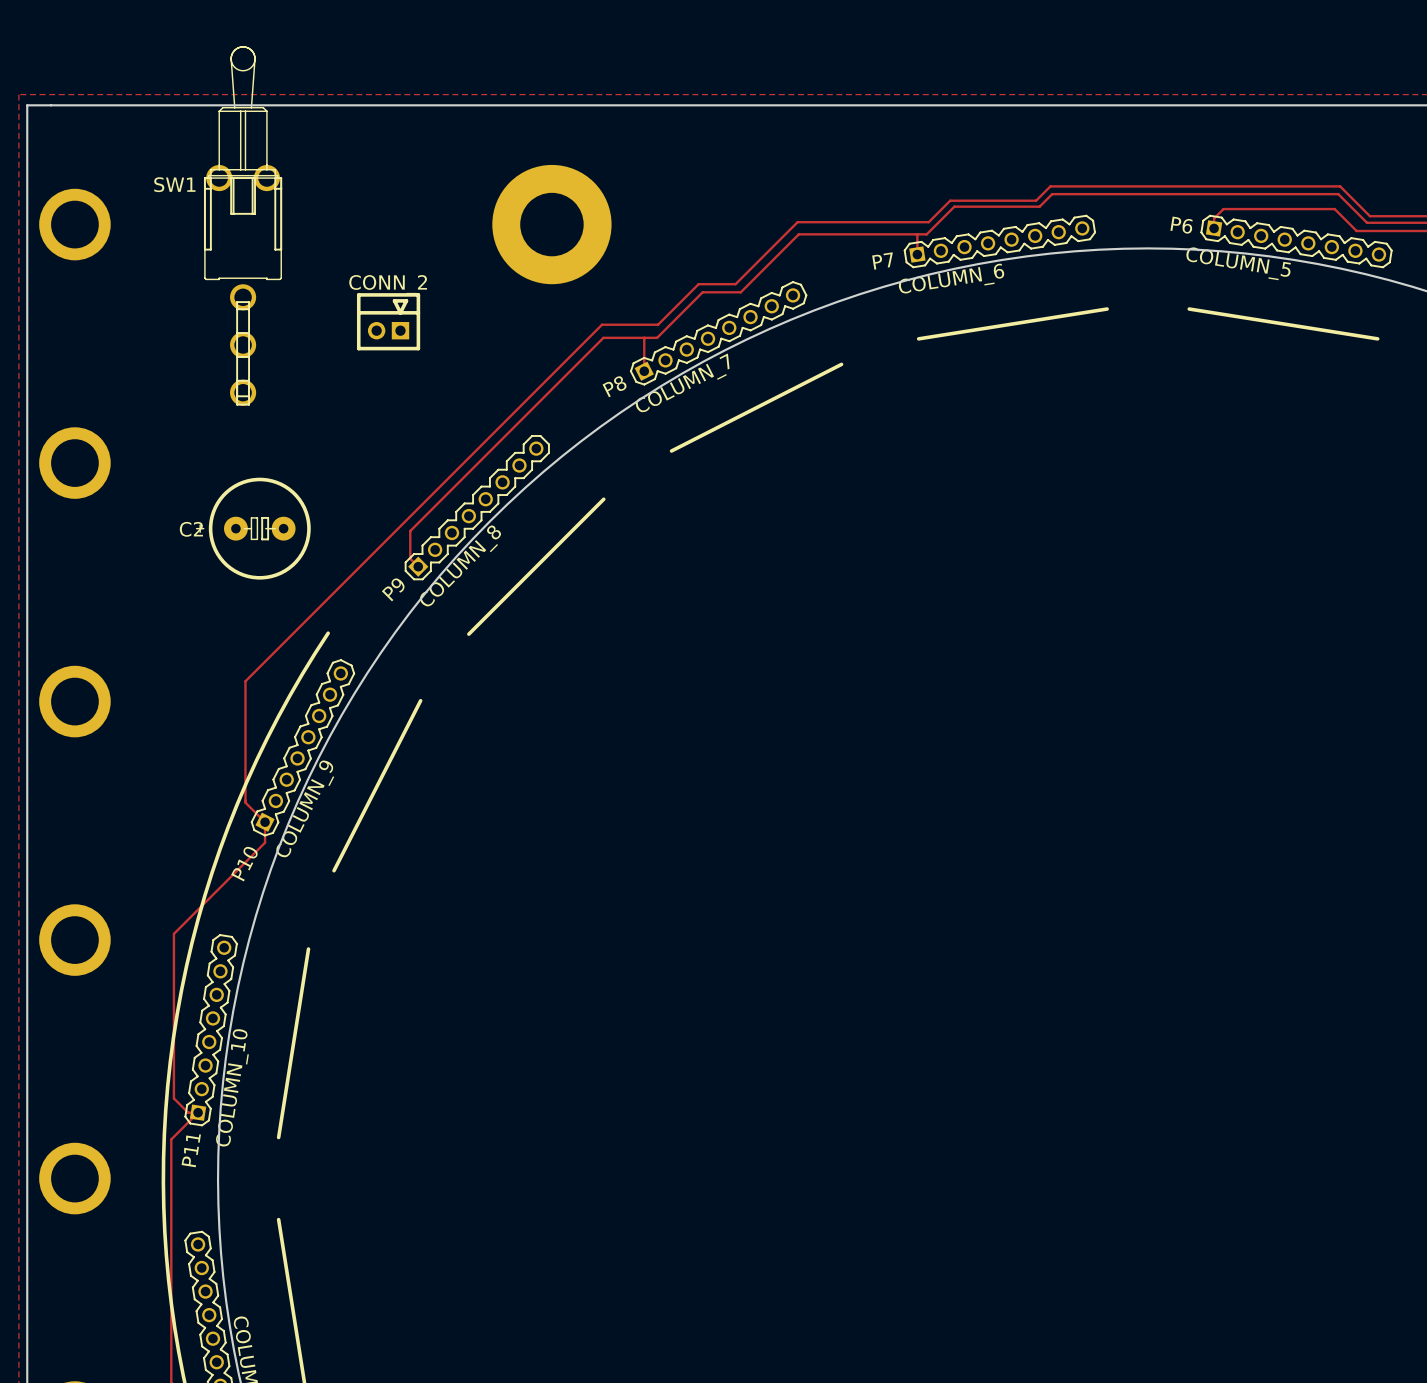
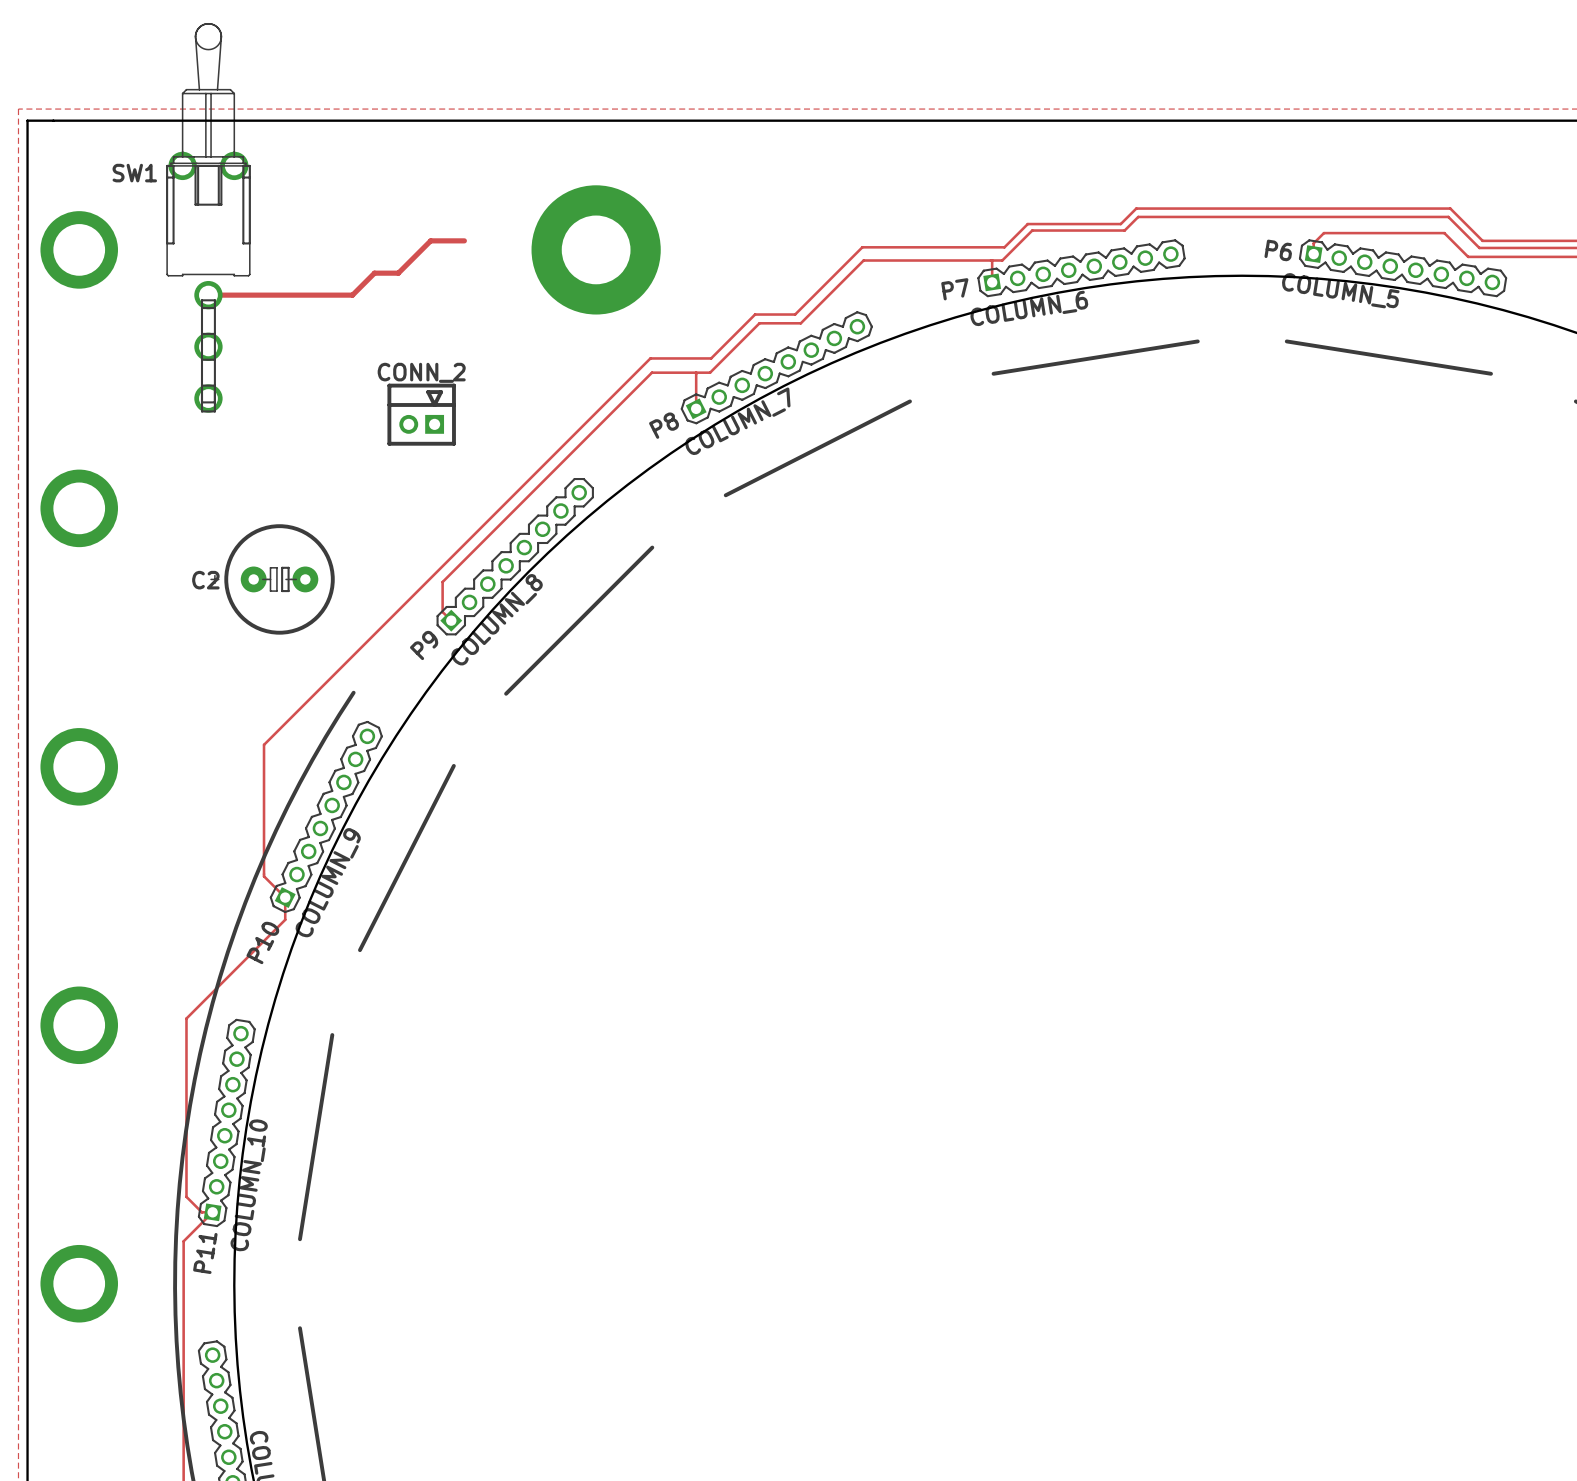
track: none -> (464, 240) (430, 240) (398, 273) (374, 273) (352, 295) (208, 295)
SW1 position: (243, 225) -> (208, 217)
part position: (388, 321) -> (421, 414)

